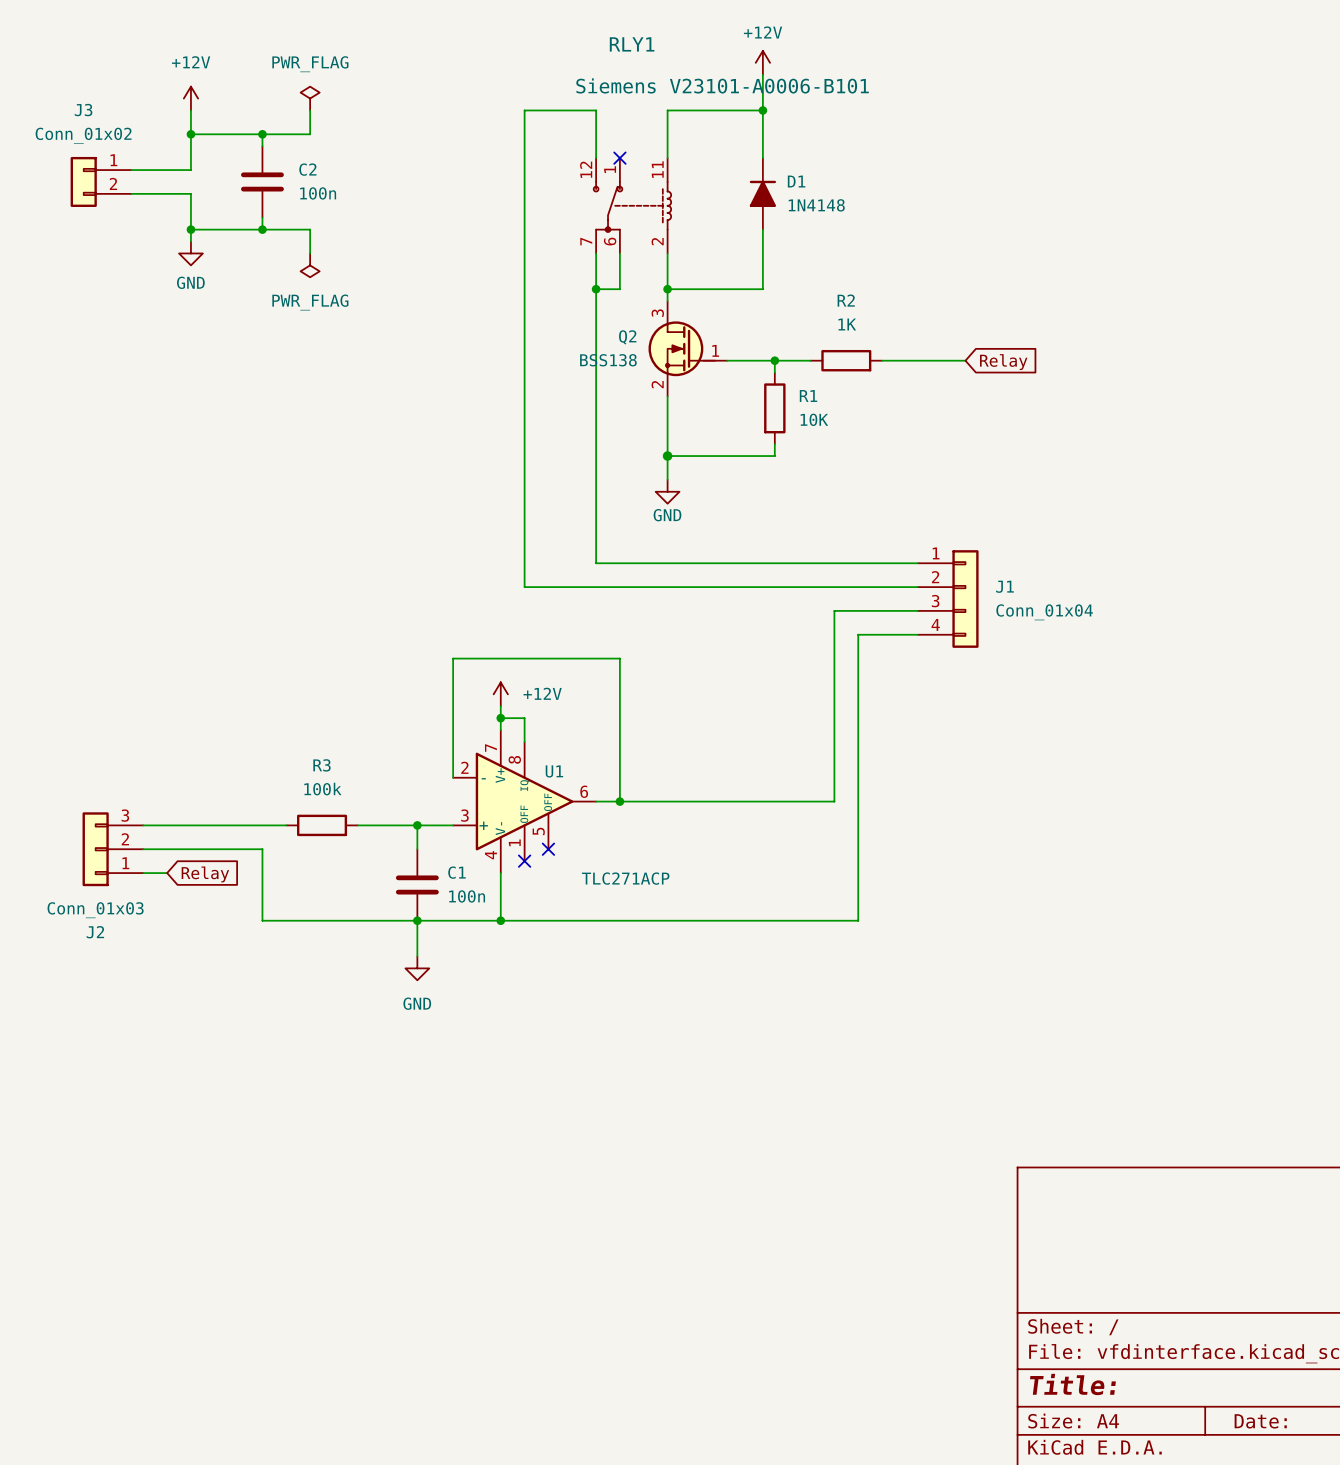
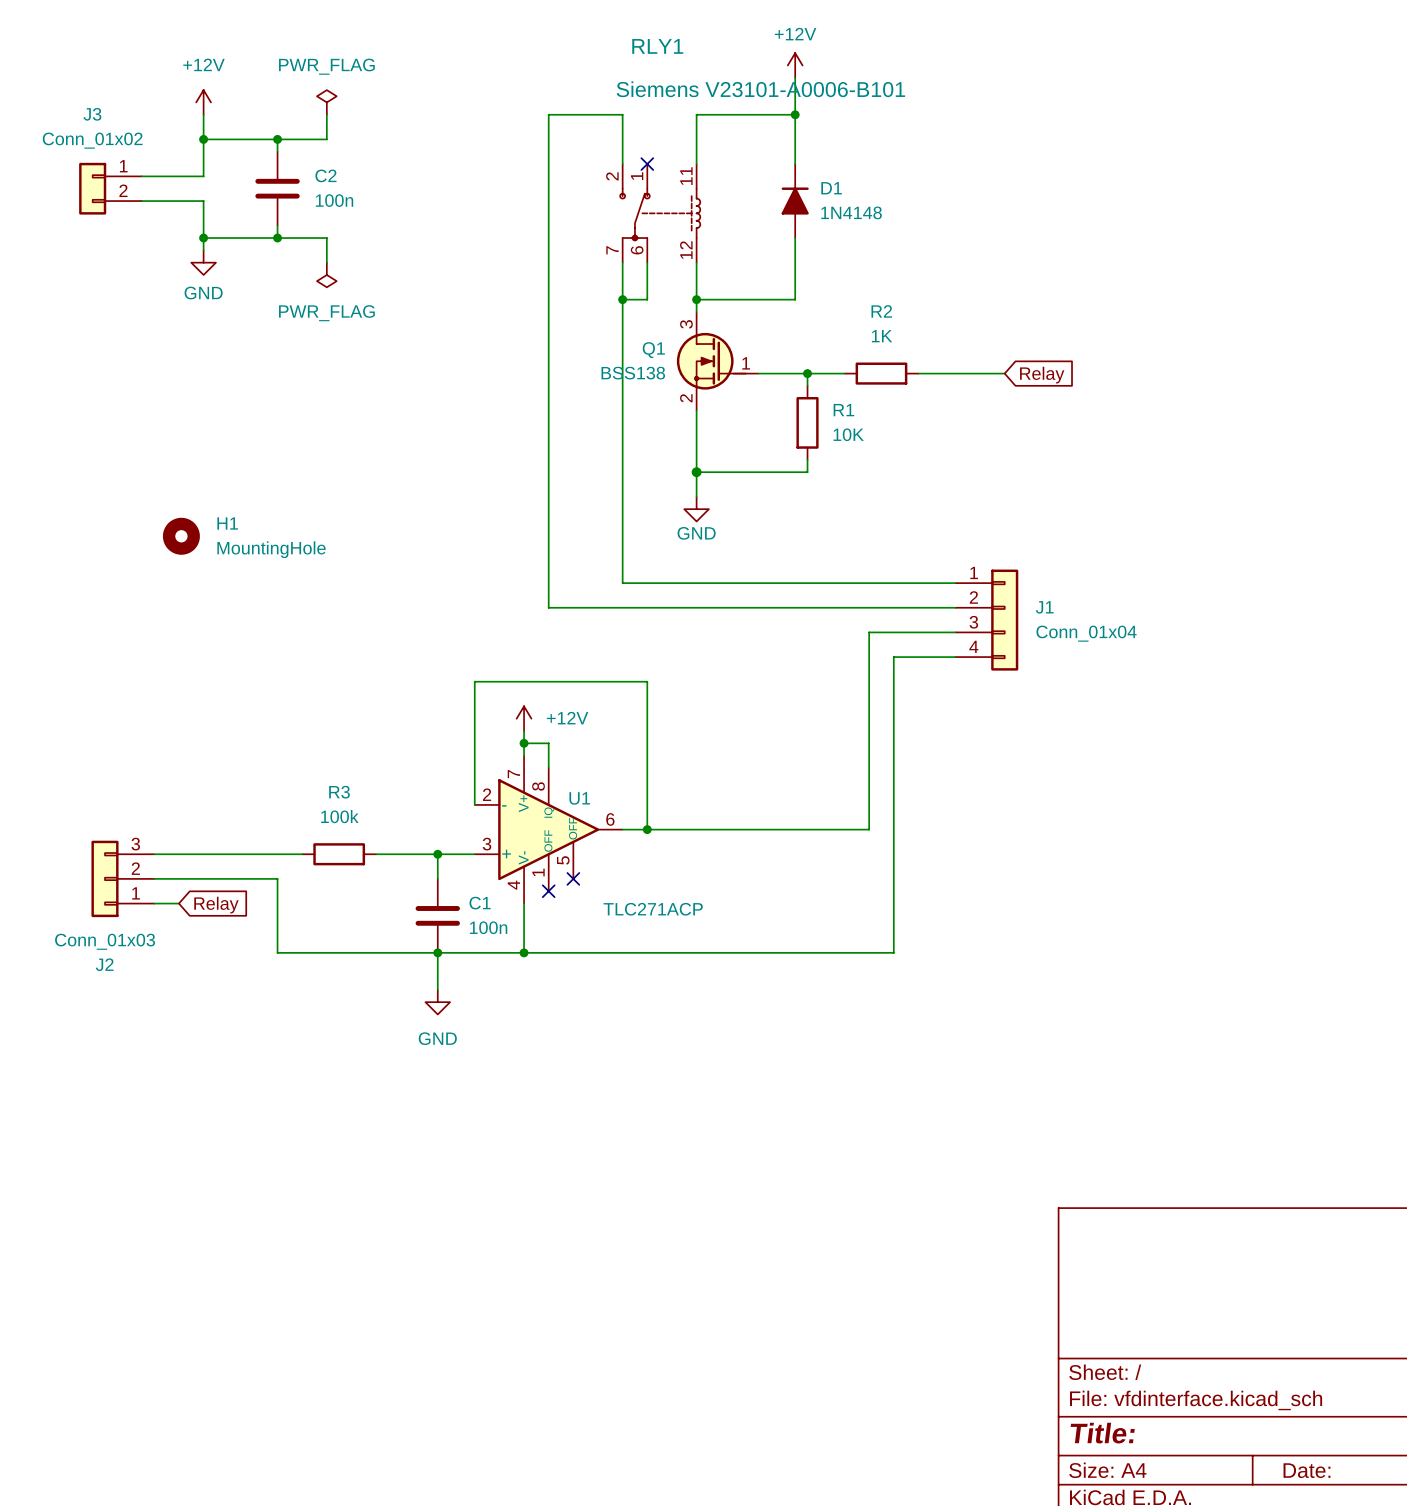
RLY1 pin number: 12 (586, 169) -> 2 (612, 176)
RLY1 pin number: 2 (657, 241) -> 12 (686, 250)
Q2 name: Q2 (627, 337) -> Q1 (653, 350)
H1: none -> MountingHole (181, 536)

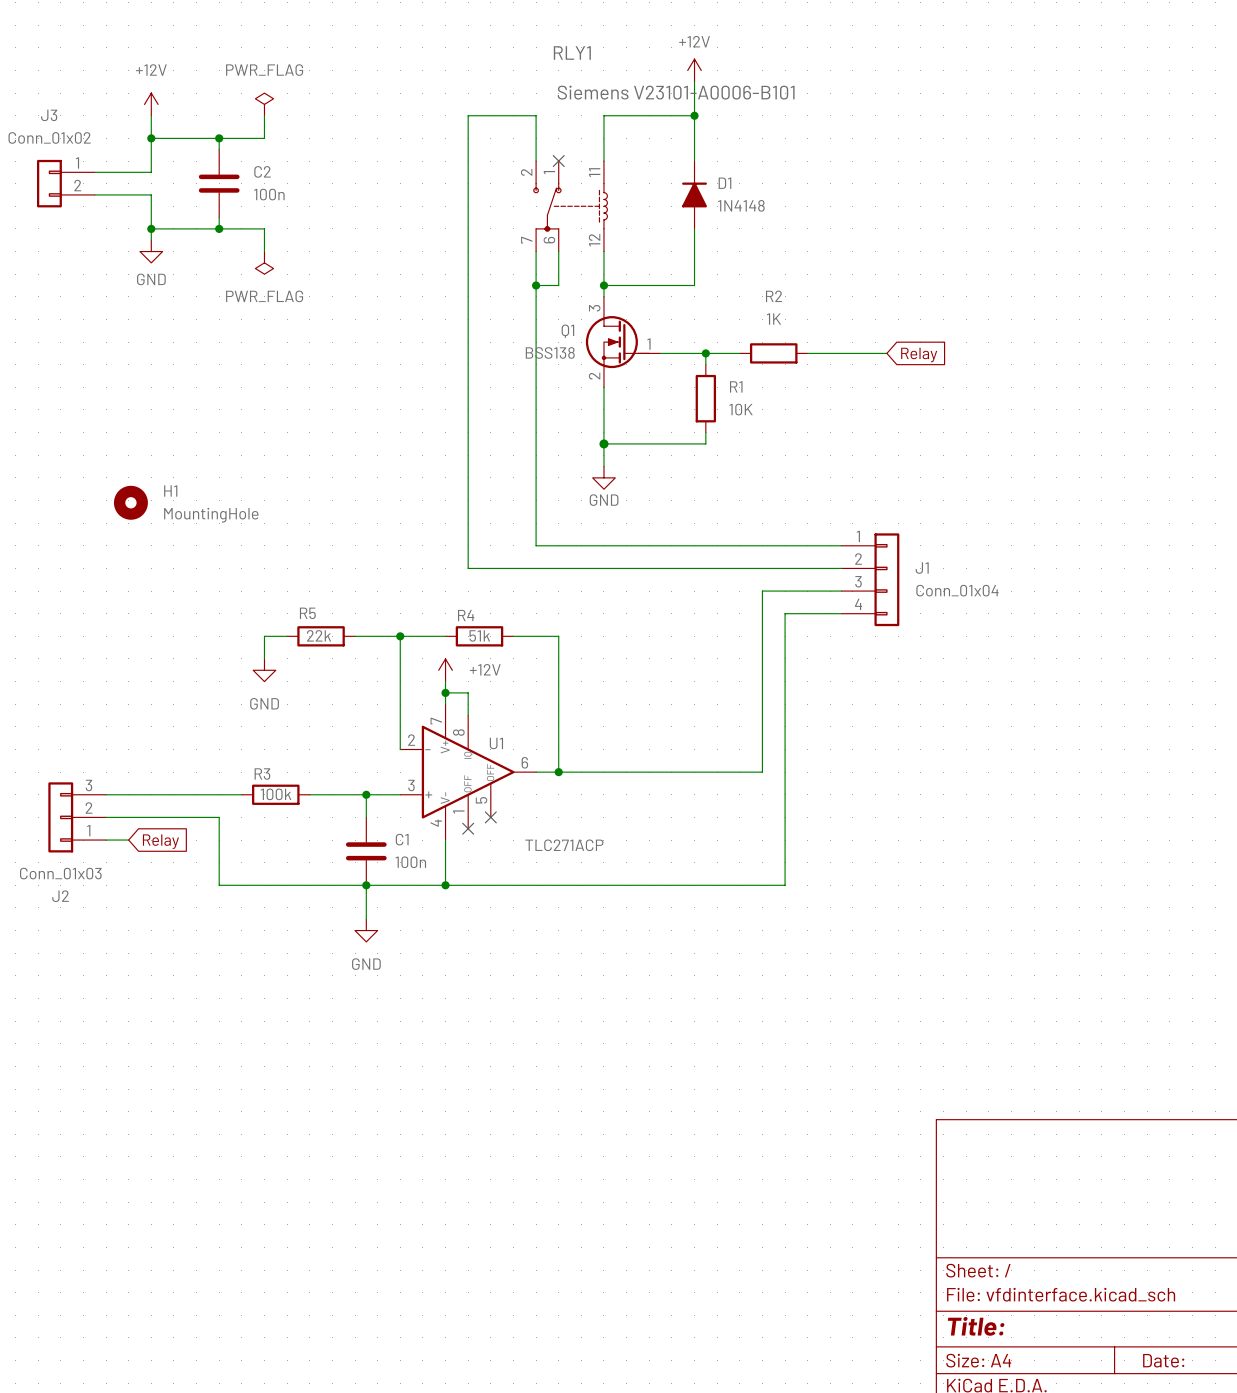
wire: none -> (287, 636) (264, 636) (264, 658)
R5: none -> 22k (321, 636)
wire: none -> (355, 636) (400, 636)
junction: none -> (400, 636)
wire: (524, 681) (598, 681) -> none
R4: none -> 51k (479, 636)
power symbol: none -> GND (264, 670)
R3 name position: R3 (339, 792) -> R3 (262, 774)
R3 value position: 100k (339, 816) -> 100k (276, 794)

